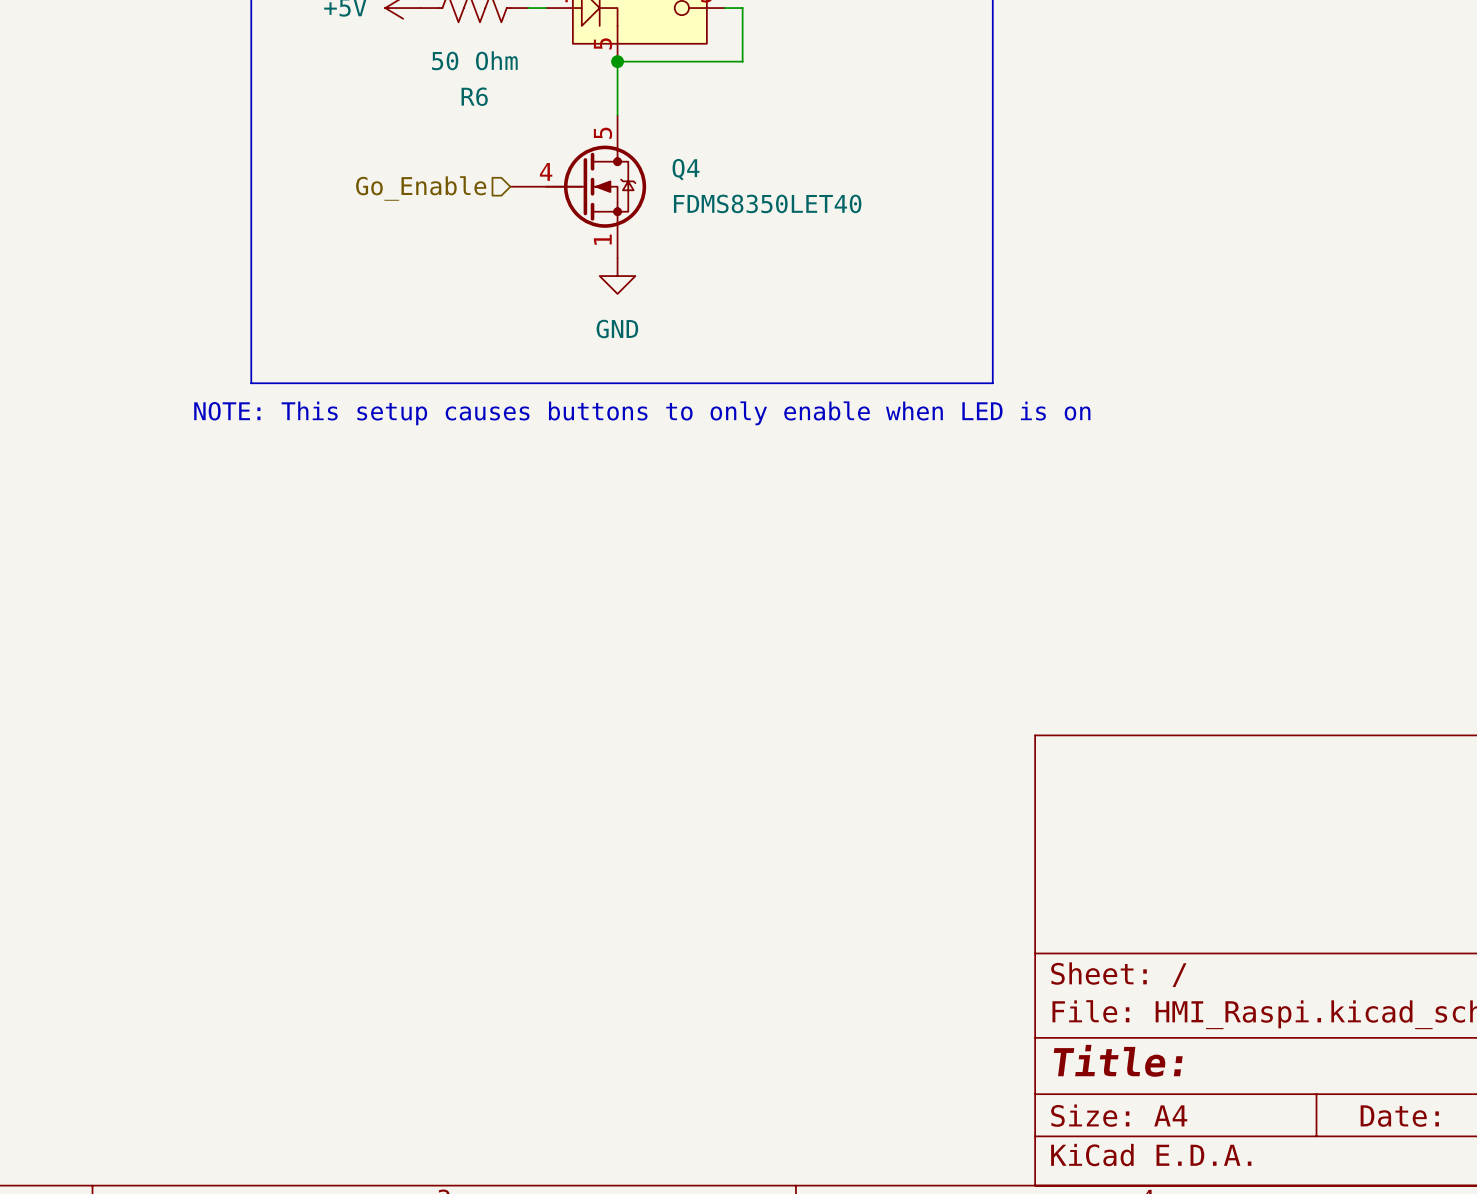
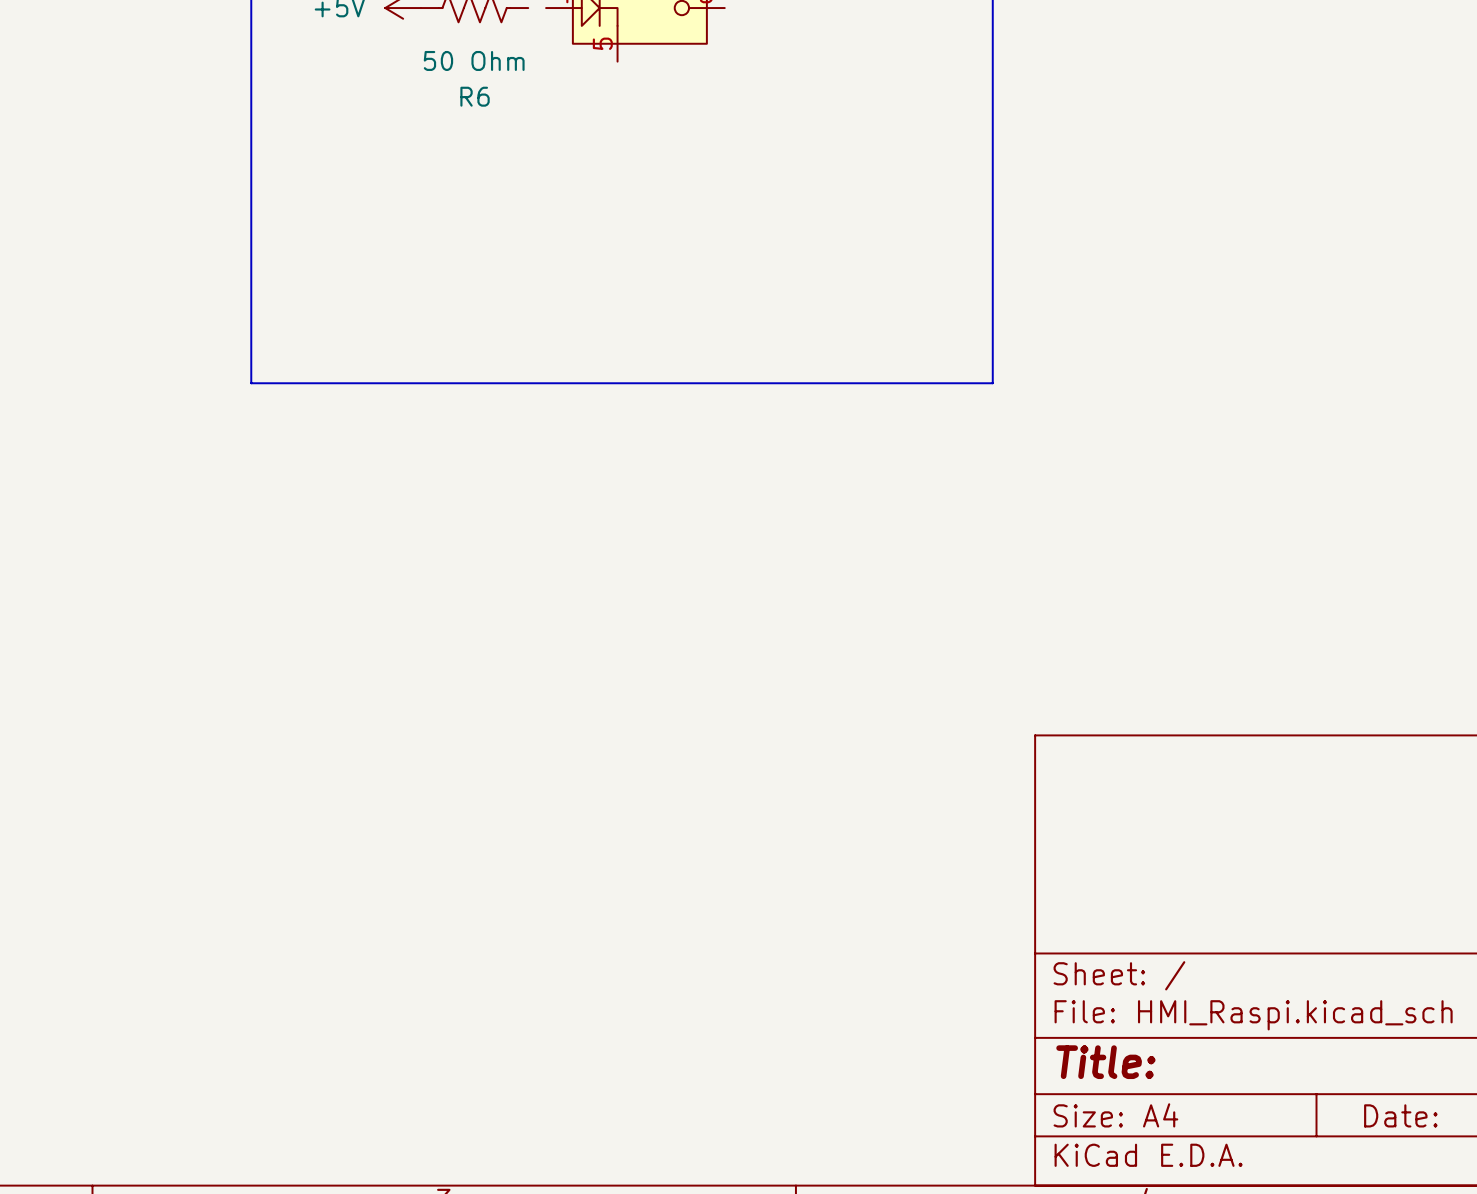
wire: (528, 8) (546, 8) -> none
wire: (724, 8) (742, 8) (742, 61) (617, 61) (617, 115) -> none
junction: (617, 61) -> none
Q4: FDMS8350LET40 (578, 186) -> none
hierarchical label: Go_Enable (421, 188) -> none
power symbol: GND (617, 276) -> none
text: NOTE: This setup causes buttons to only enable when LED is on (642, 413) -> none

